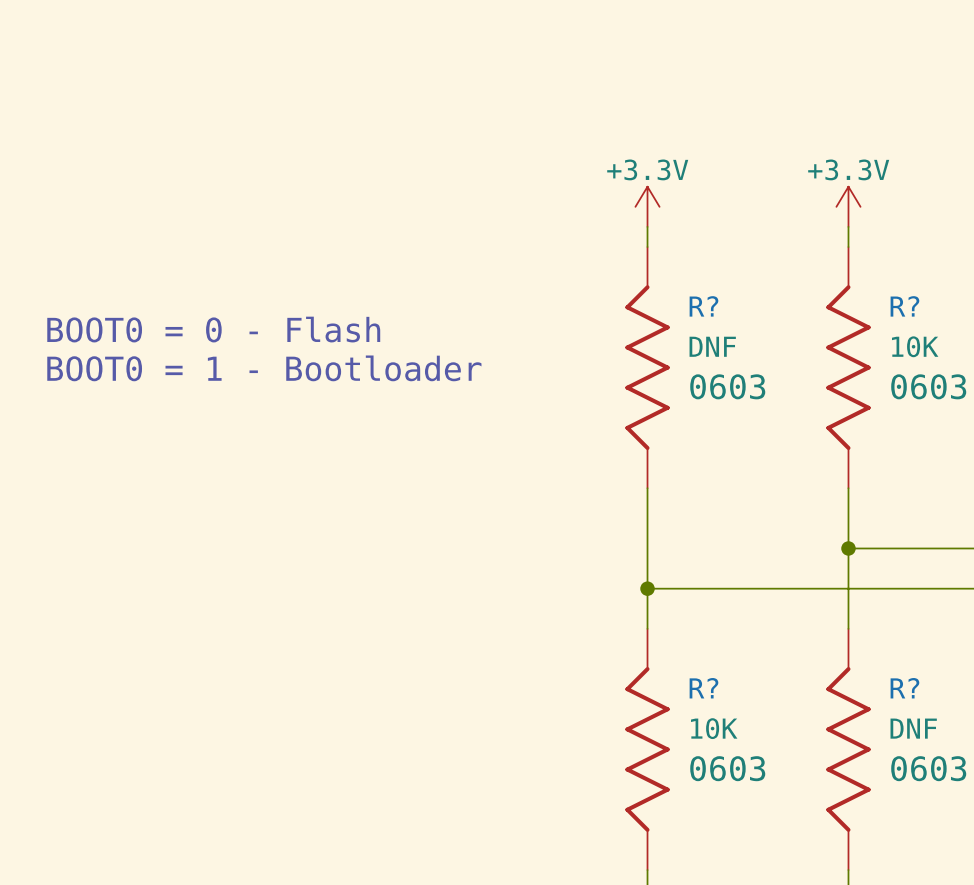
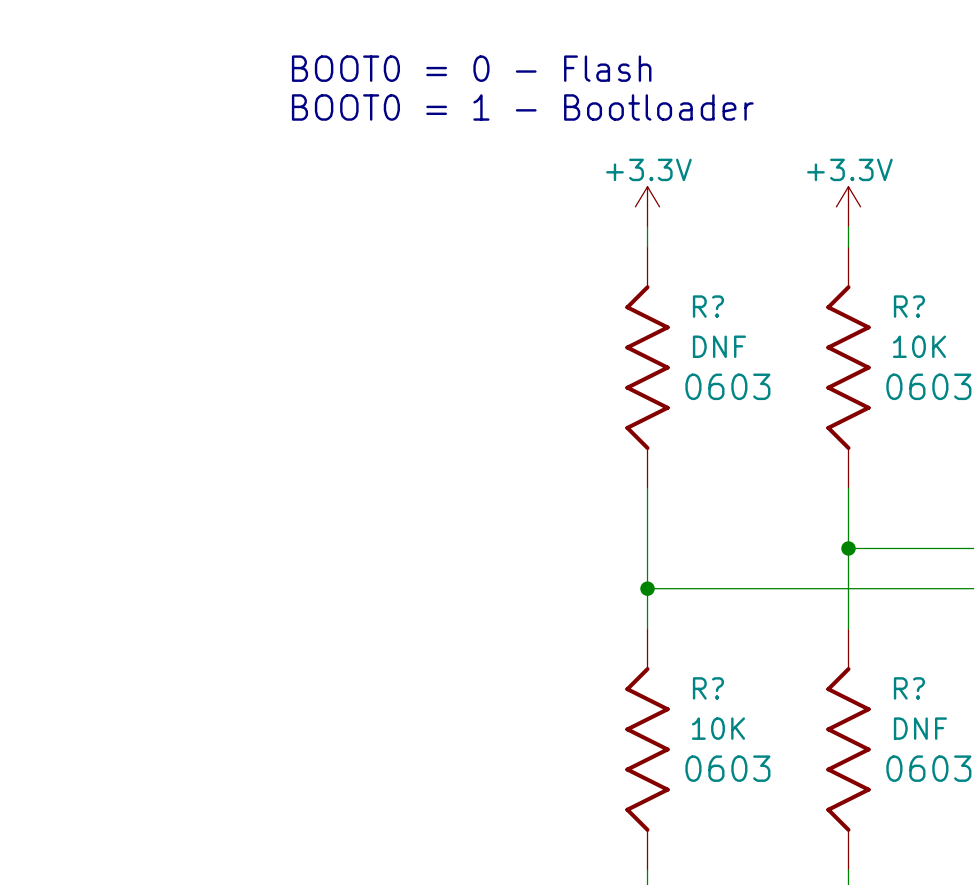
text position: BOOT0 = 0 - Flash (213, 329) -> BOOT0 = 0 - Flash (471, 68)
text position: BOOT0 = 1 - Bootloader (264, 368) -> BOOT0 = 1 - Bootloader (522, 107)

